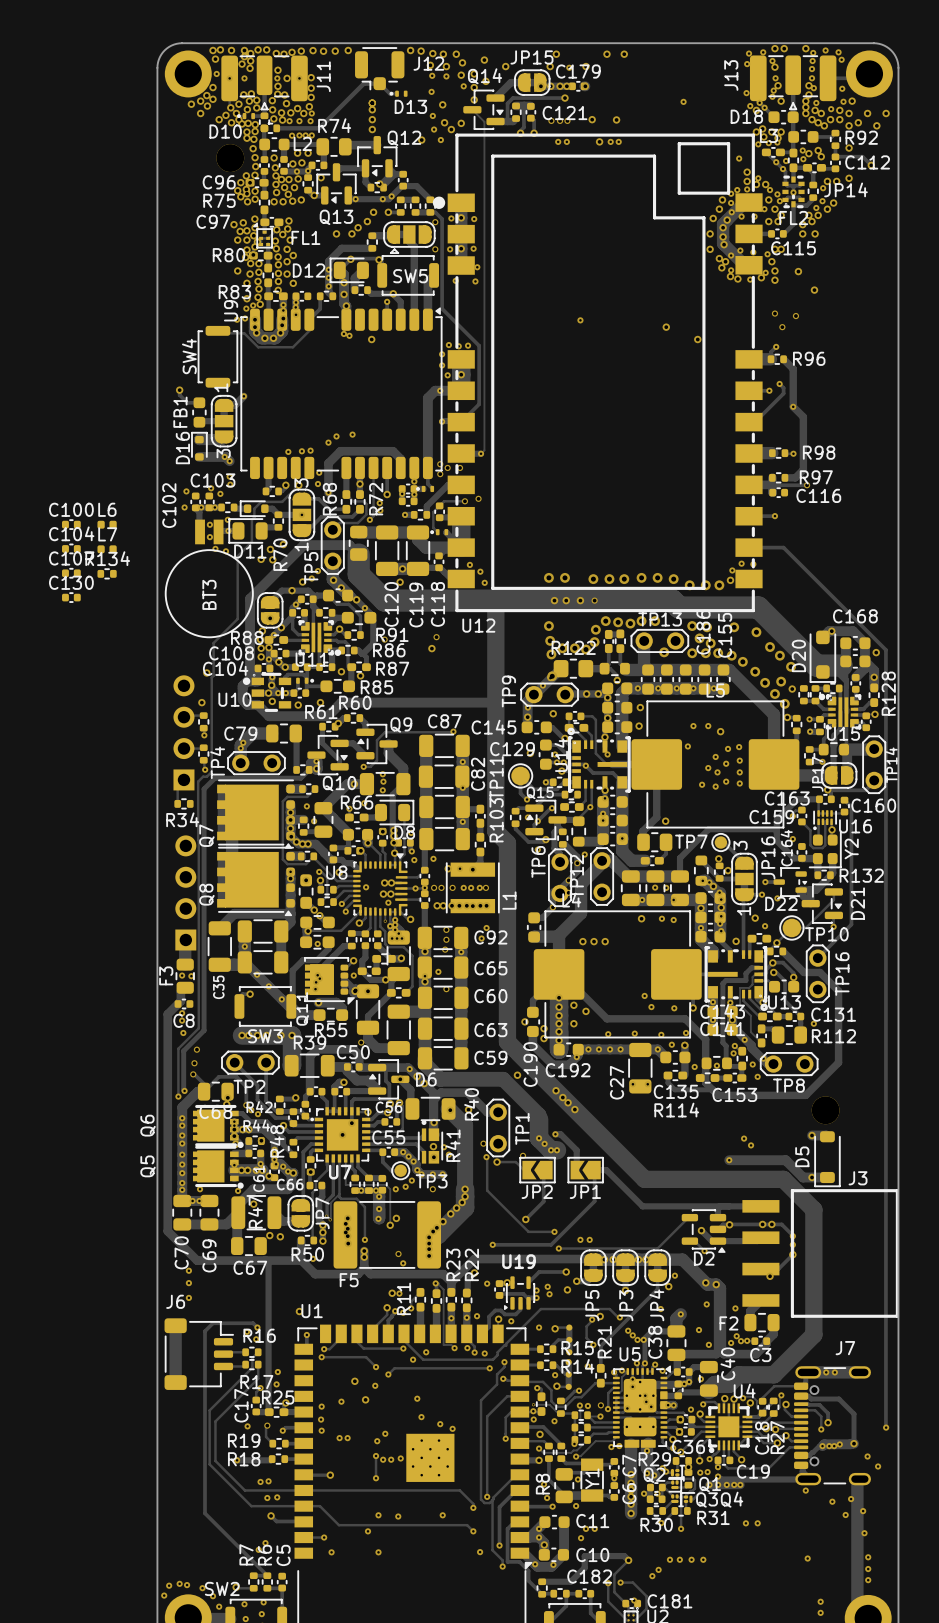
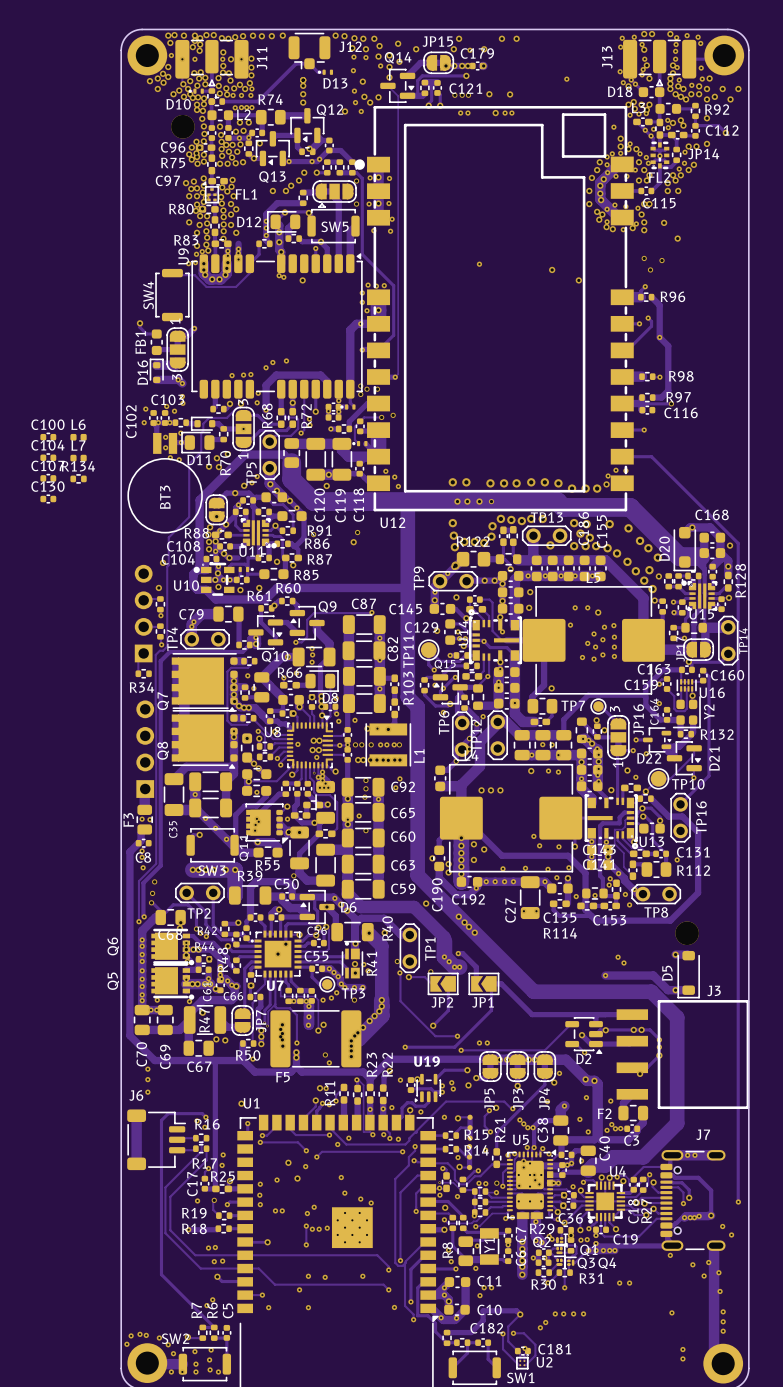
part: (301, 296) -> none
part: (301, 667) -> none

